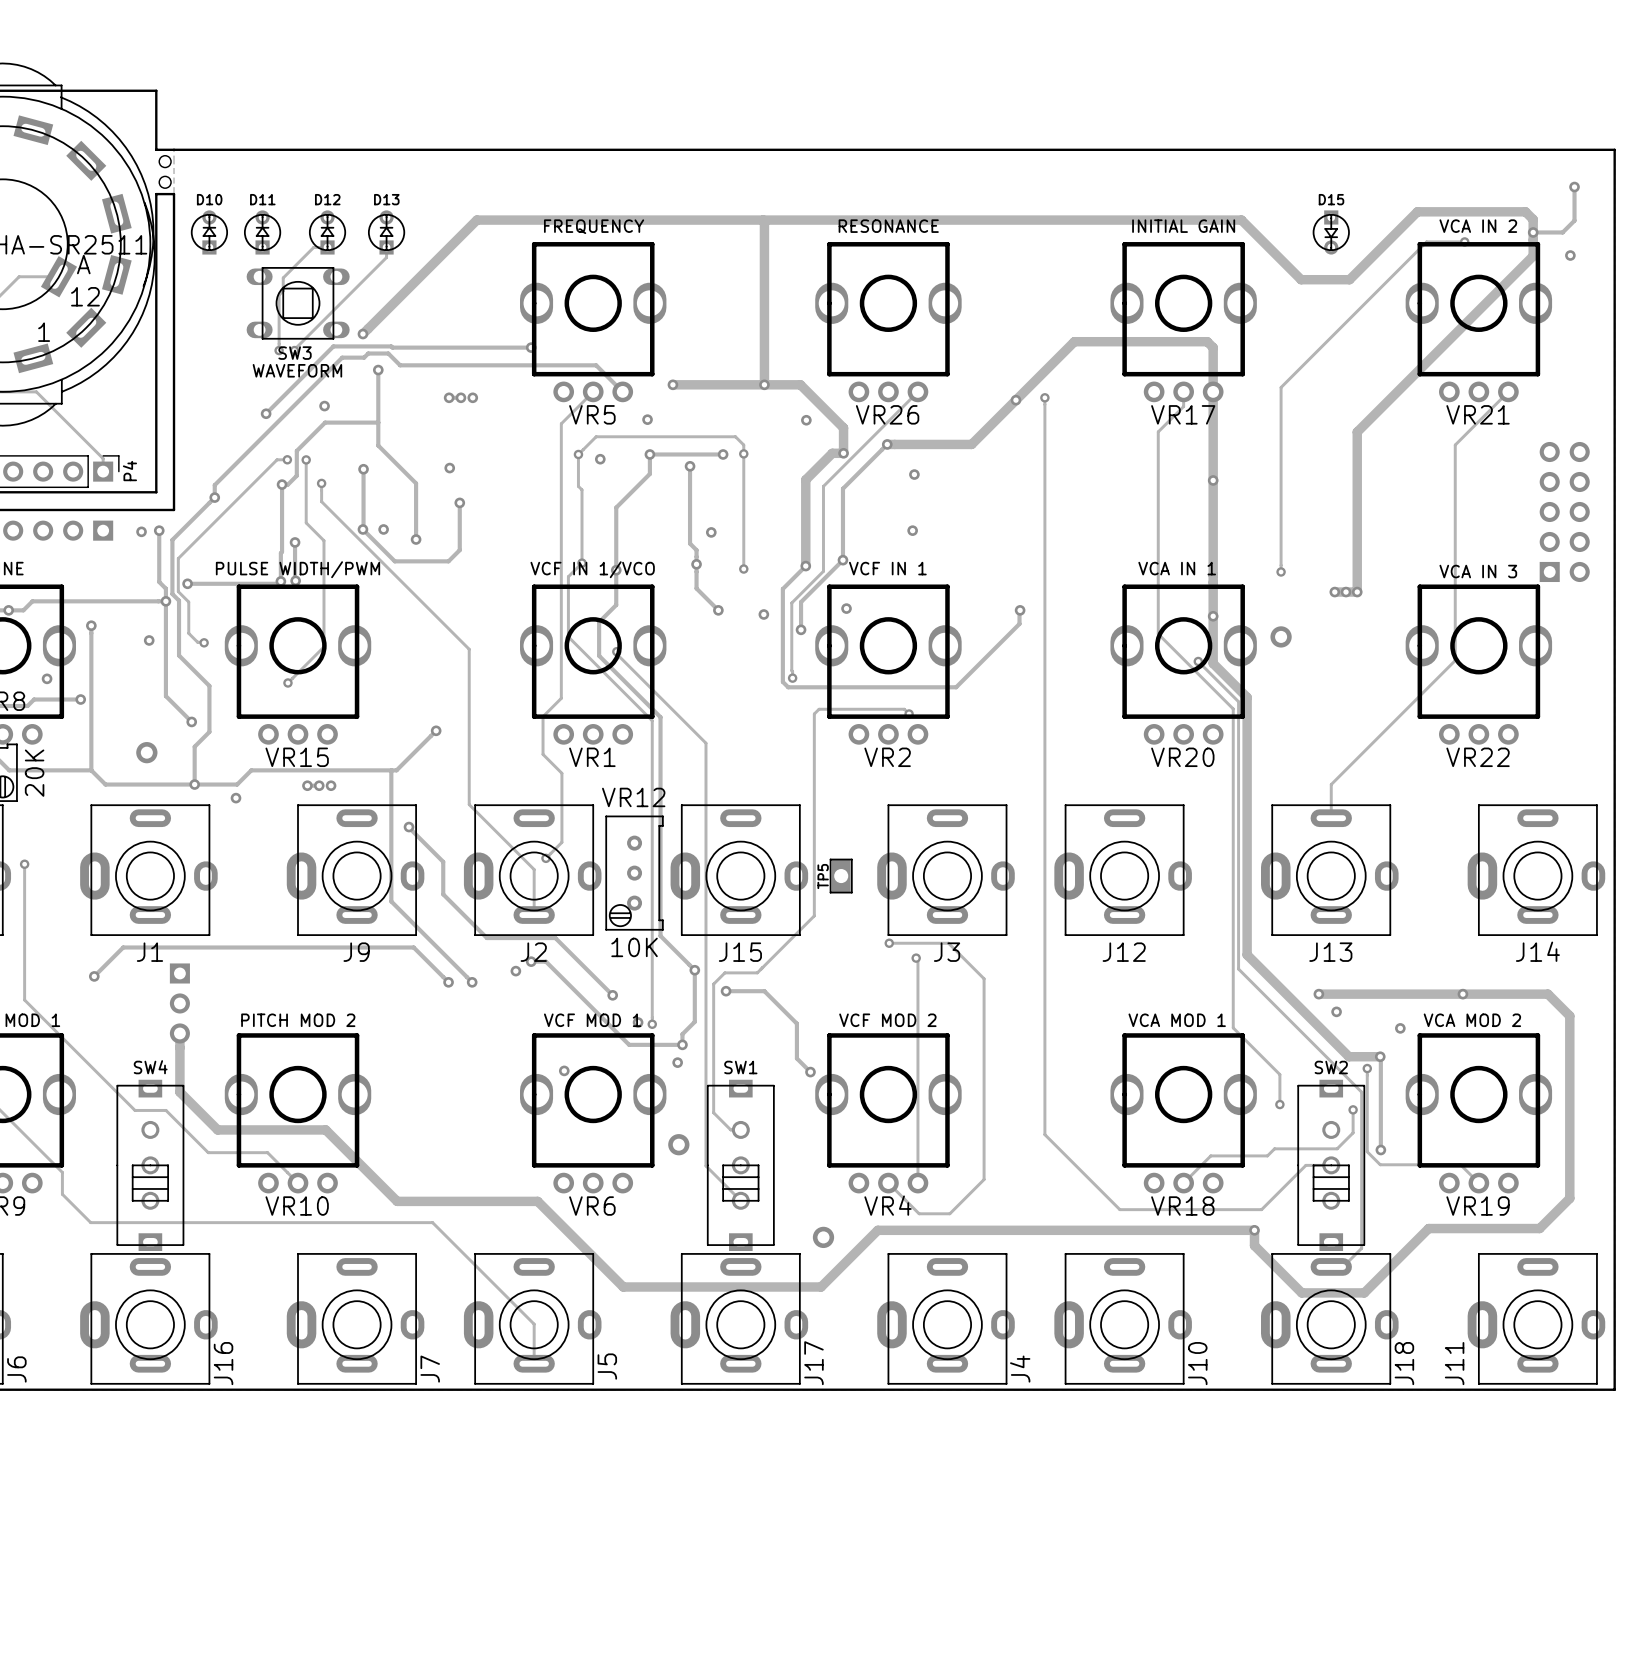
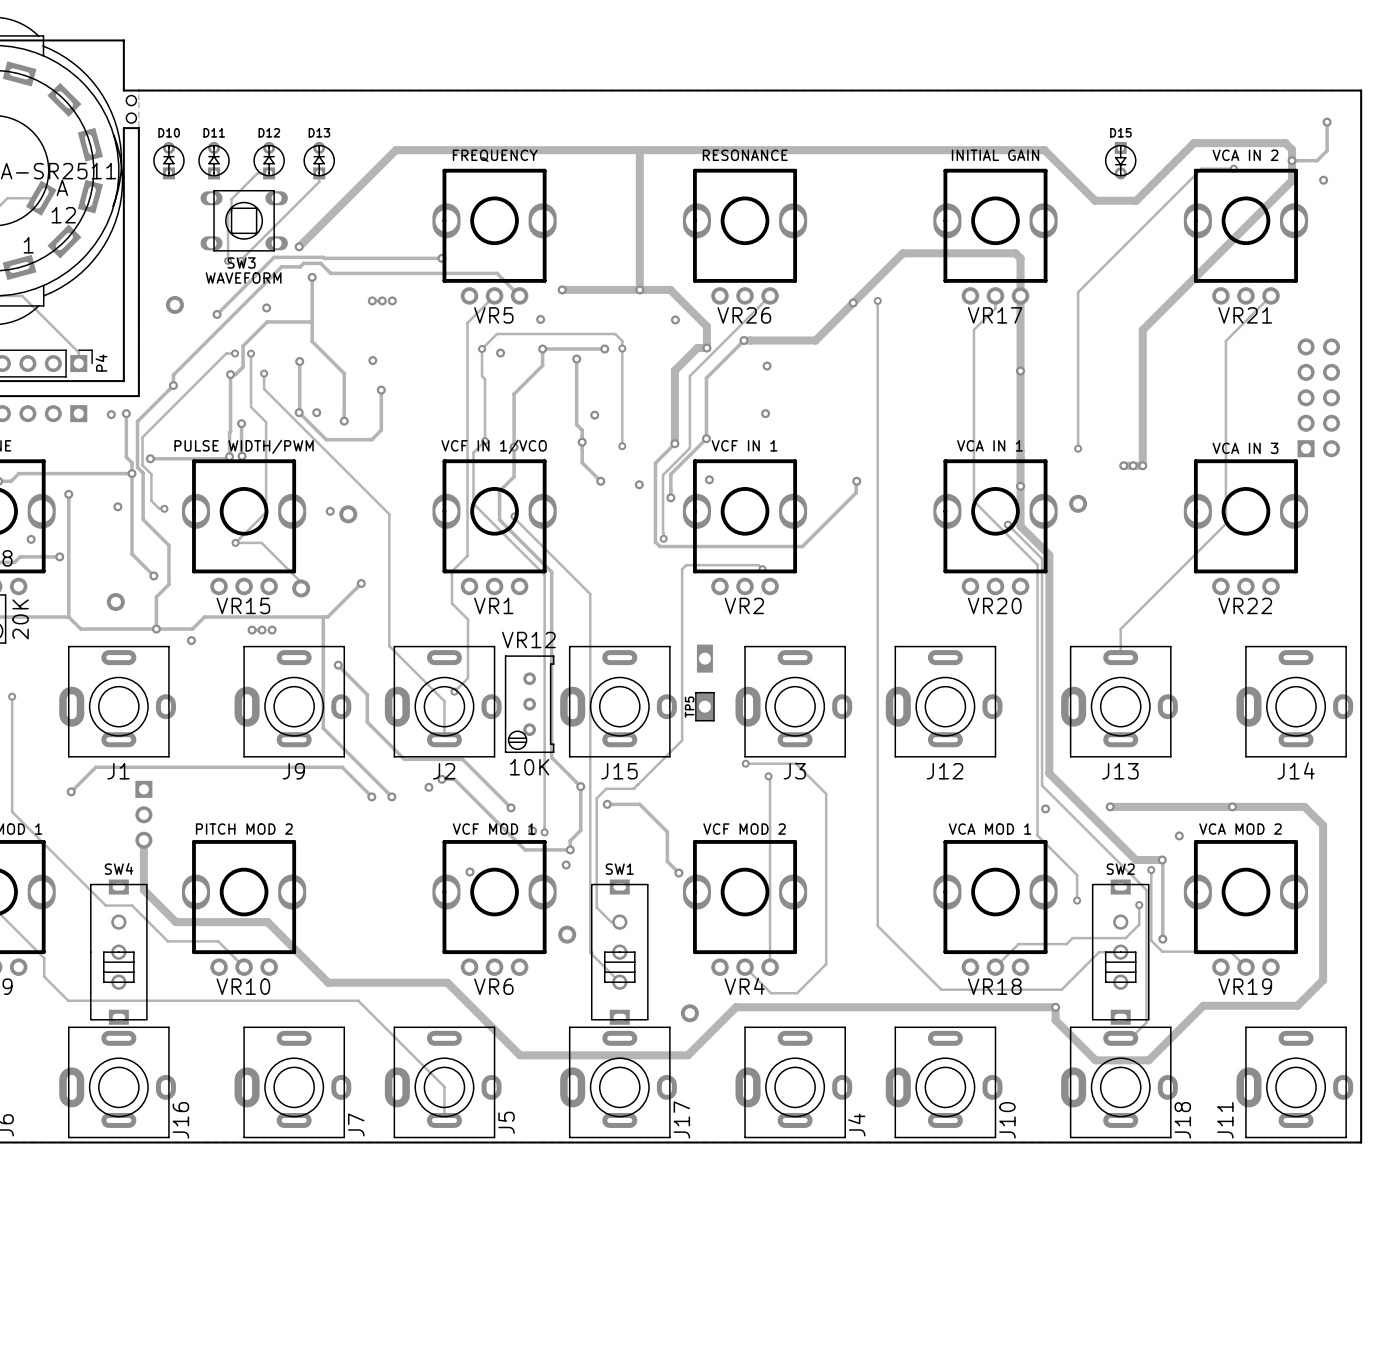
part: none -> (174, 304)
via: none -> (330, 511)
part: none -> (348, 514)
track: none -> (235, 542) (261, 542) (301, 582) (301, 588)
part: none -> (301, 588)
part: none -> (704, 658)
via: none -> (1045, 808)
via: (1336, 1011) -> none

